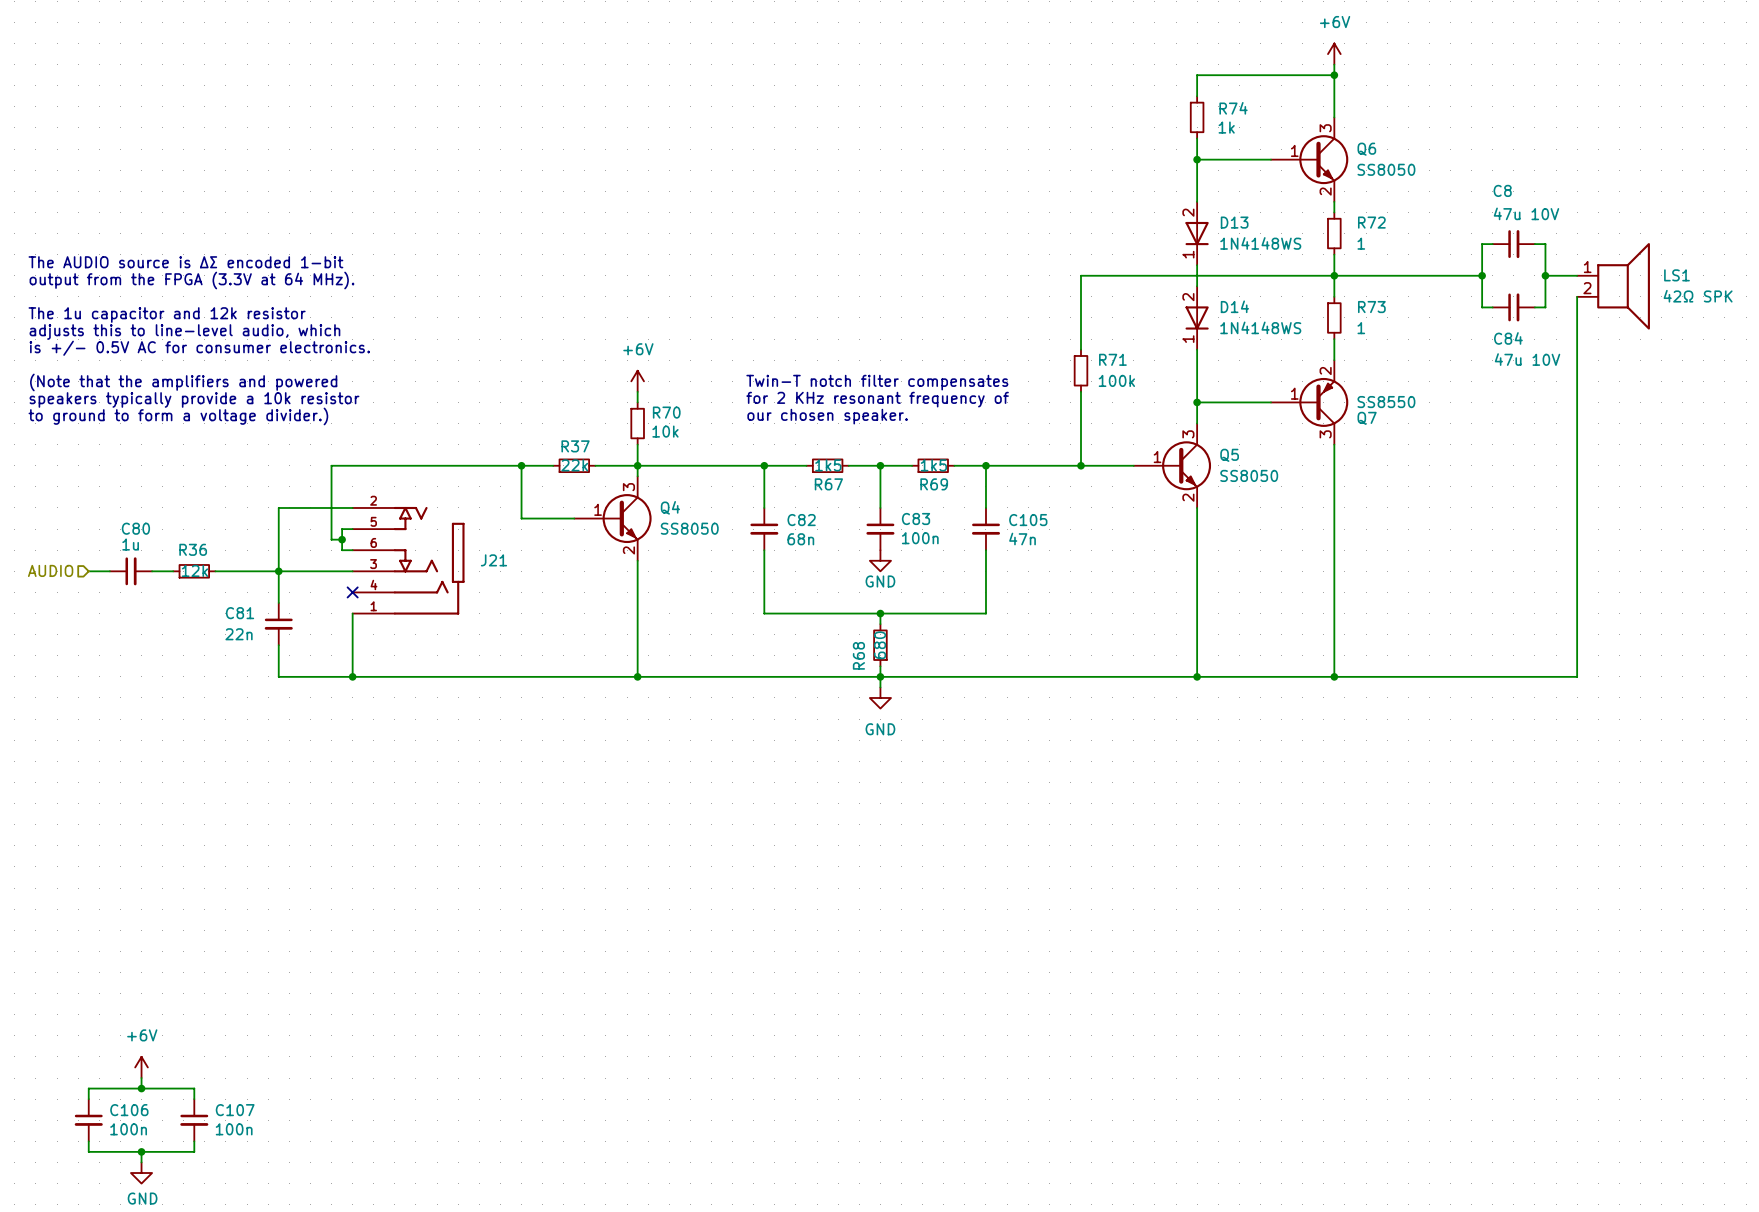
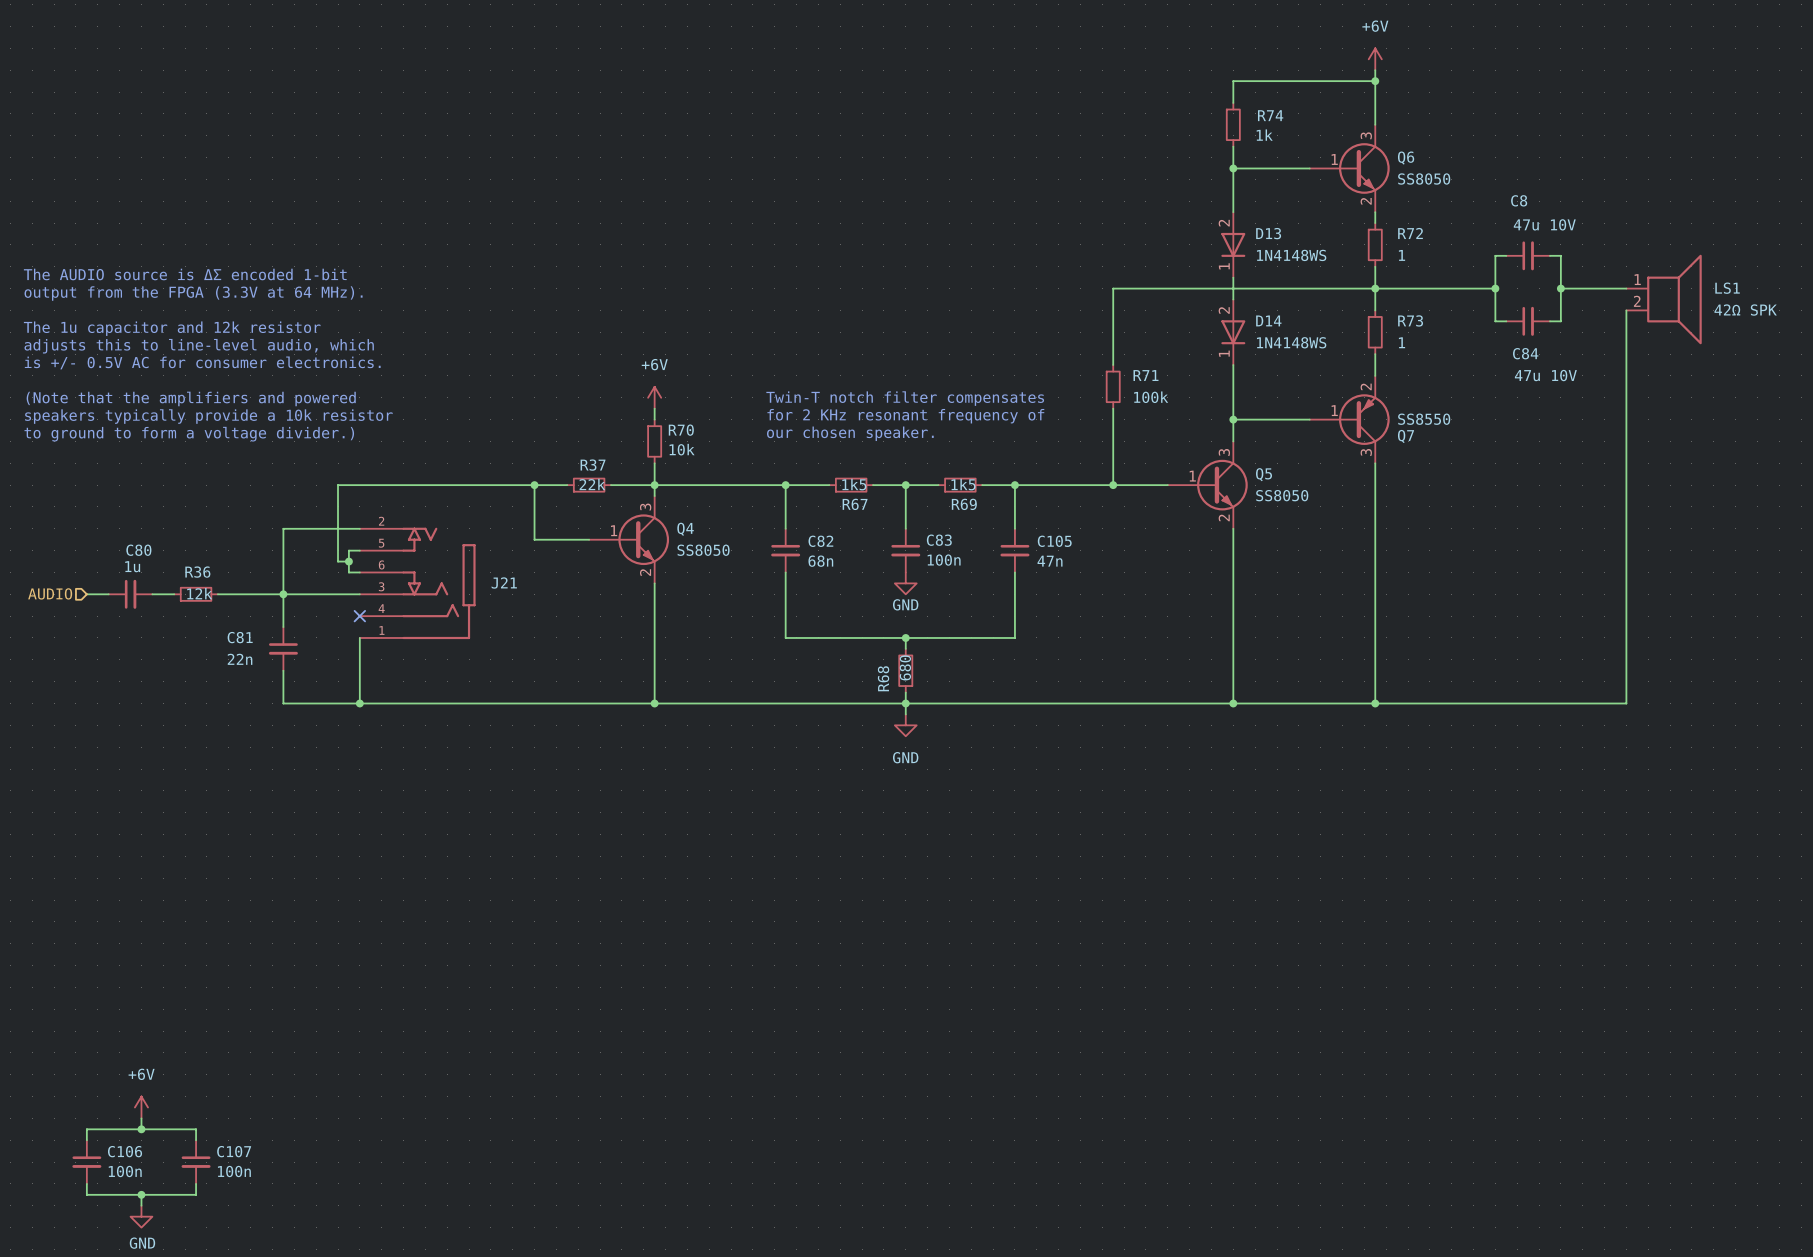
wire: (1492, 244) (1482, 244) (1482, 307) (1492, 307) -> (1506, 255) (1495, 255) (1495, 321) (1506, 321)
C8 position: (1513, 244) -> (1528, 255)
wire: (1534, 244) (1545, 244) (1545, 307) (1534, 307) -> (1549, 255) (1560, 255) (1560, 321) (1549, 321)
wire: (1450, 275) (1482, 275) -> (1560, 288) (1593, 288)
junction: none -> (1495, 288)
junction: (1482, 275) -> none
junction: none -> (1560, 288)
junction: (1545, 275) -> none
C84 position: (1513, 307) -> (1528, 321)

